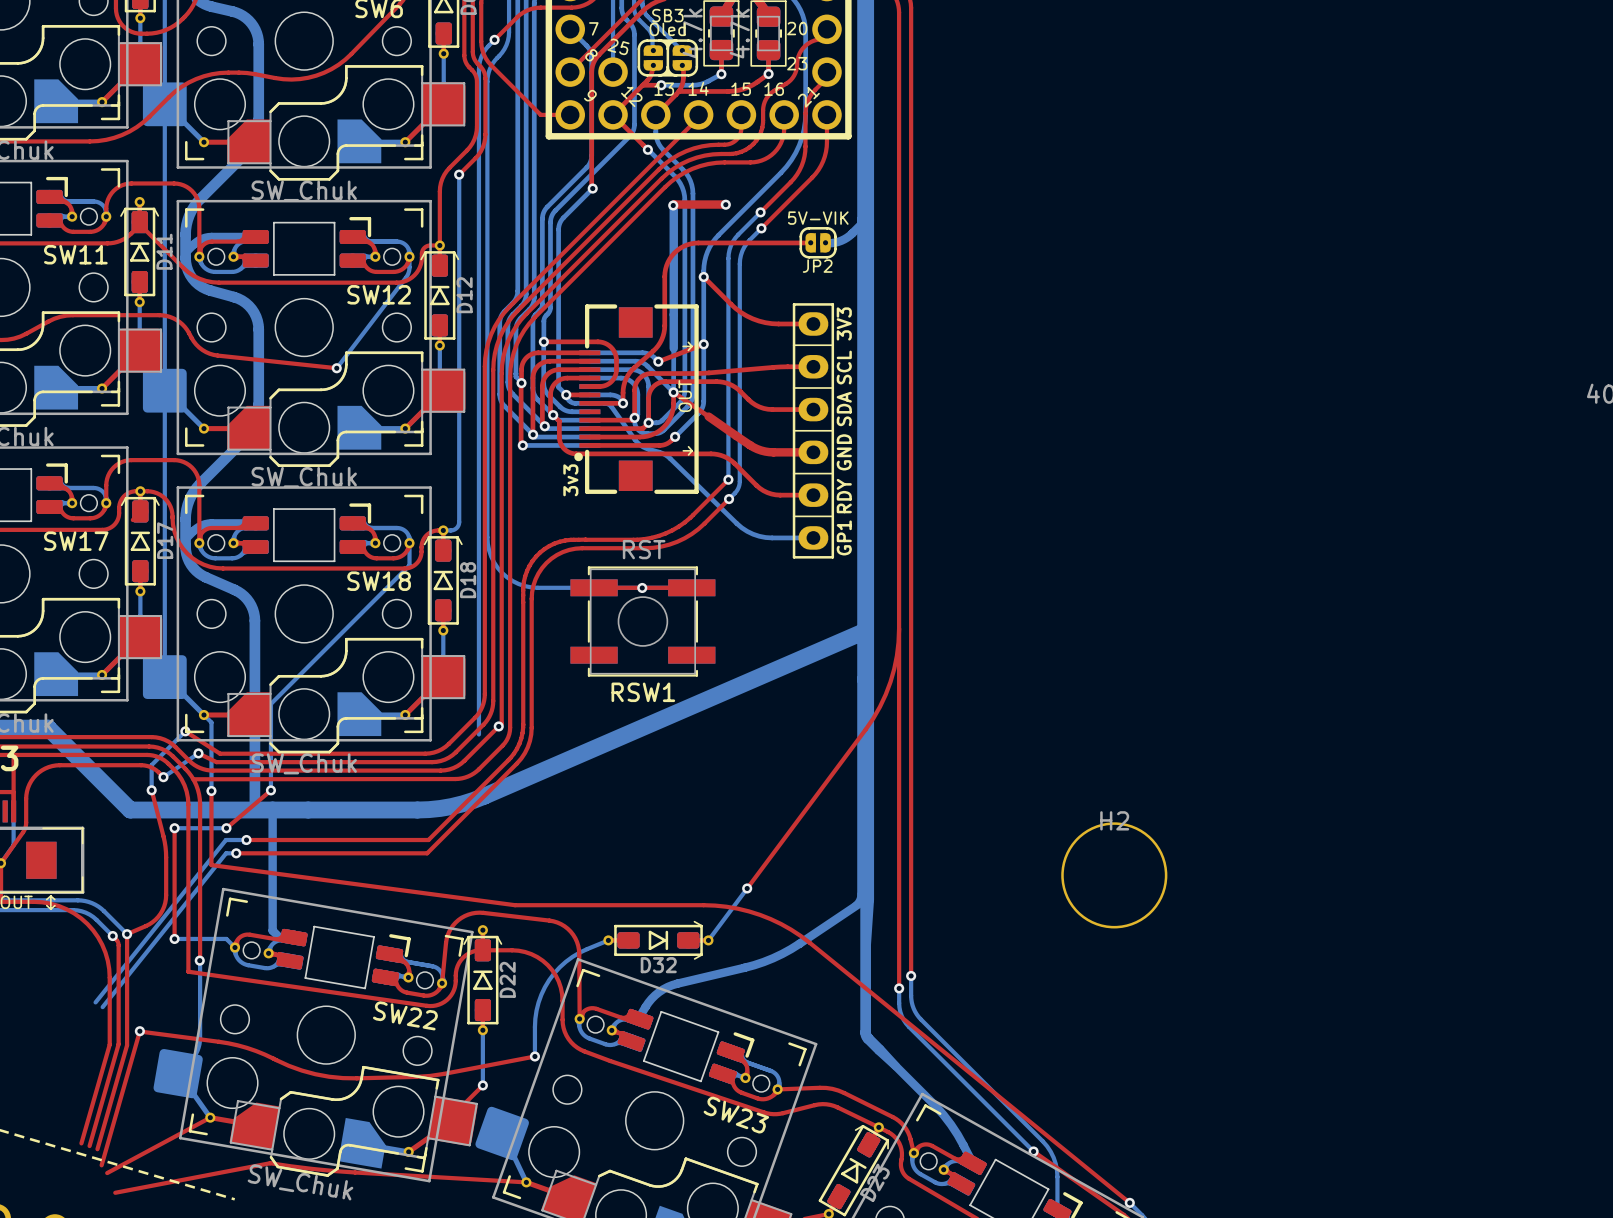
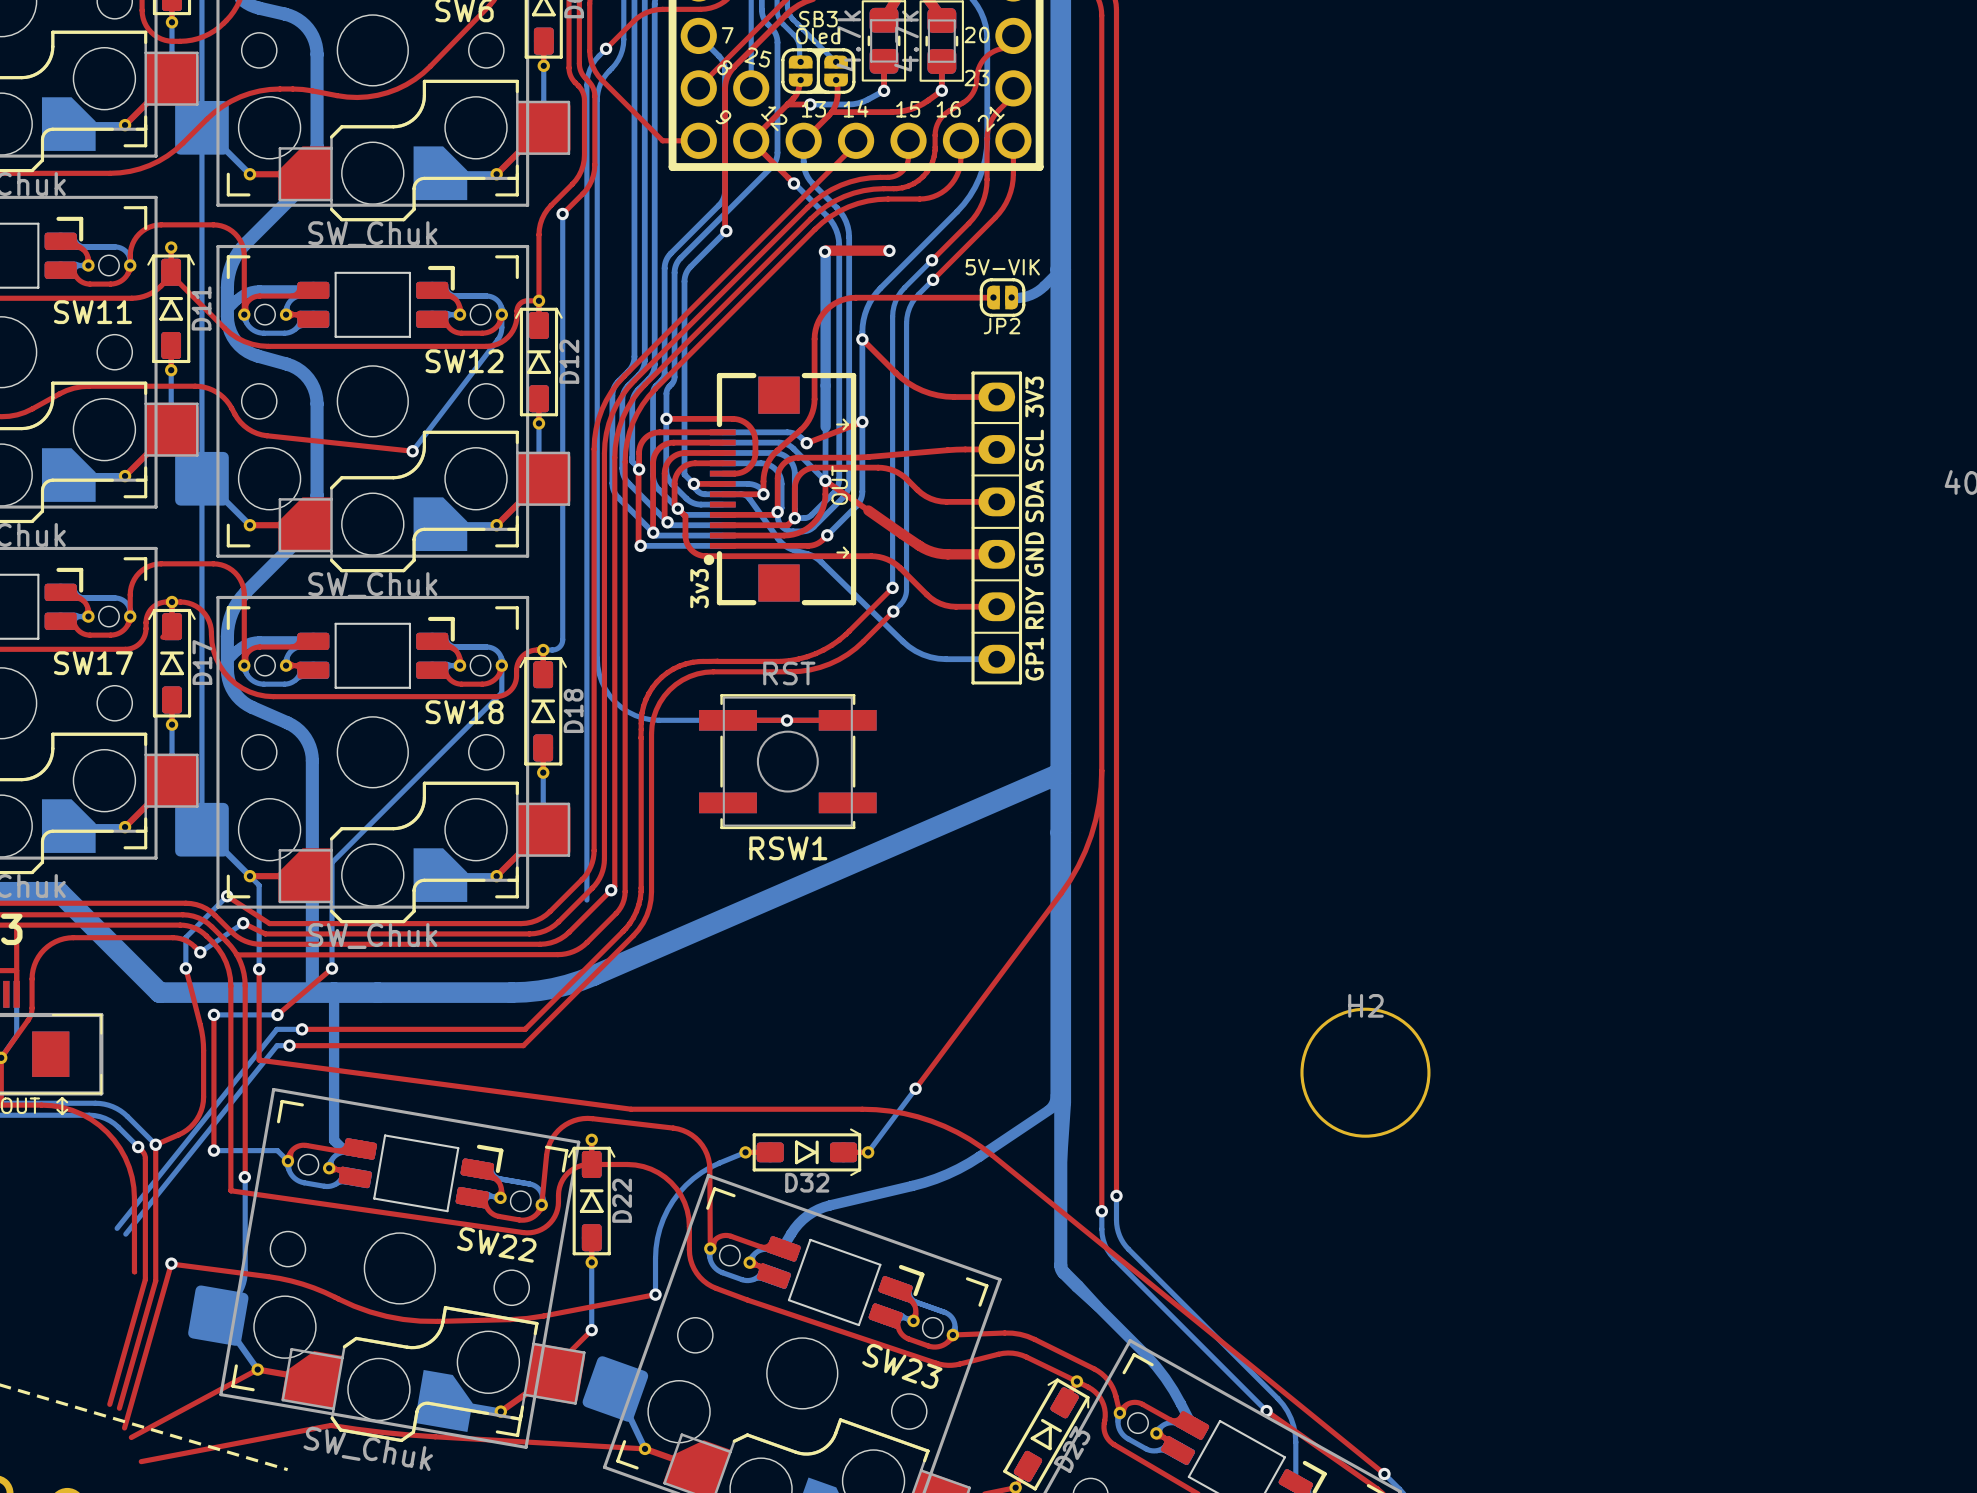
top track: (109, 1037) (109, 1044) (81, 1143) -> none

